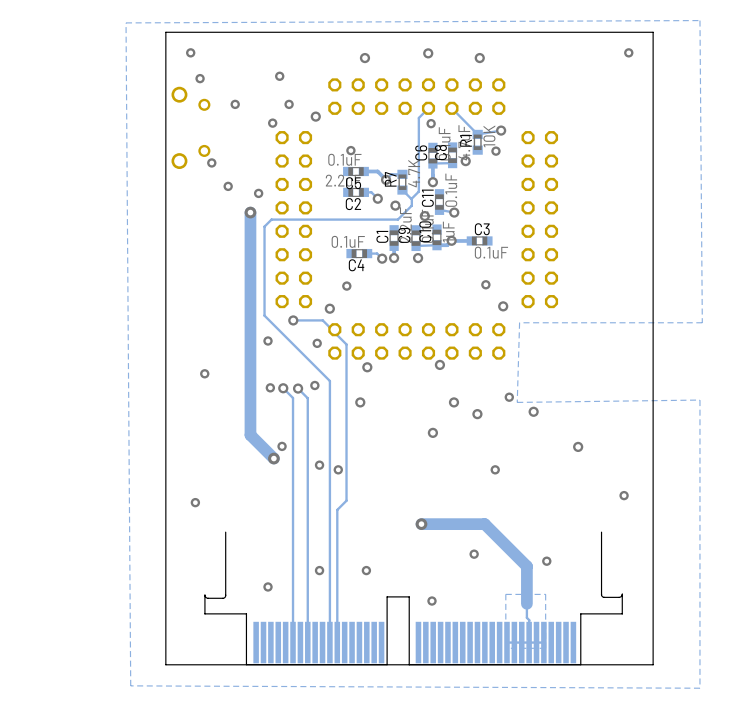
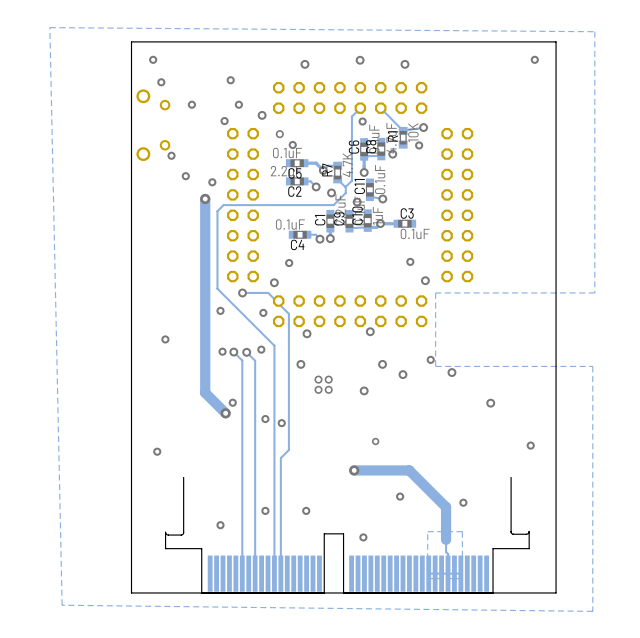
zone outline: (699, 20) (702, 322) (519, 322) (517, 402) (699, 400) (699, 688) (130, 685) (126, 22) (699, 20) -> (49, 27) (594, 31) (594, 292) (435, 292) (435, 366) (592, 366) (592, 611) (62, 605) (49, 27)
via: none -> (279, 134)
via: (418, 258) -> none
via: none -> (318, 379)
via: none -> (328, 379)
via: none -> (318, 389)
via: none -> (328, 389)
via: (495, 469) -> none
via: none -> (375, 441)

